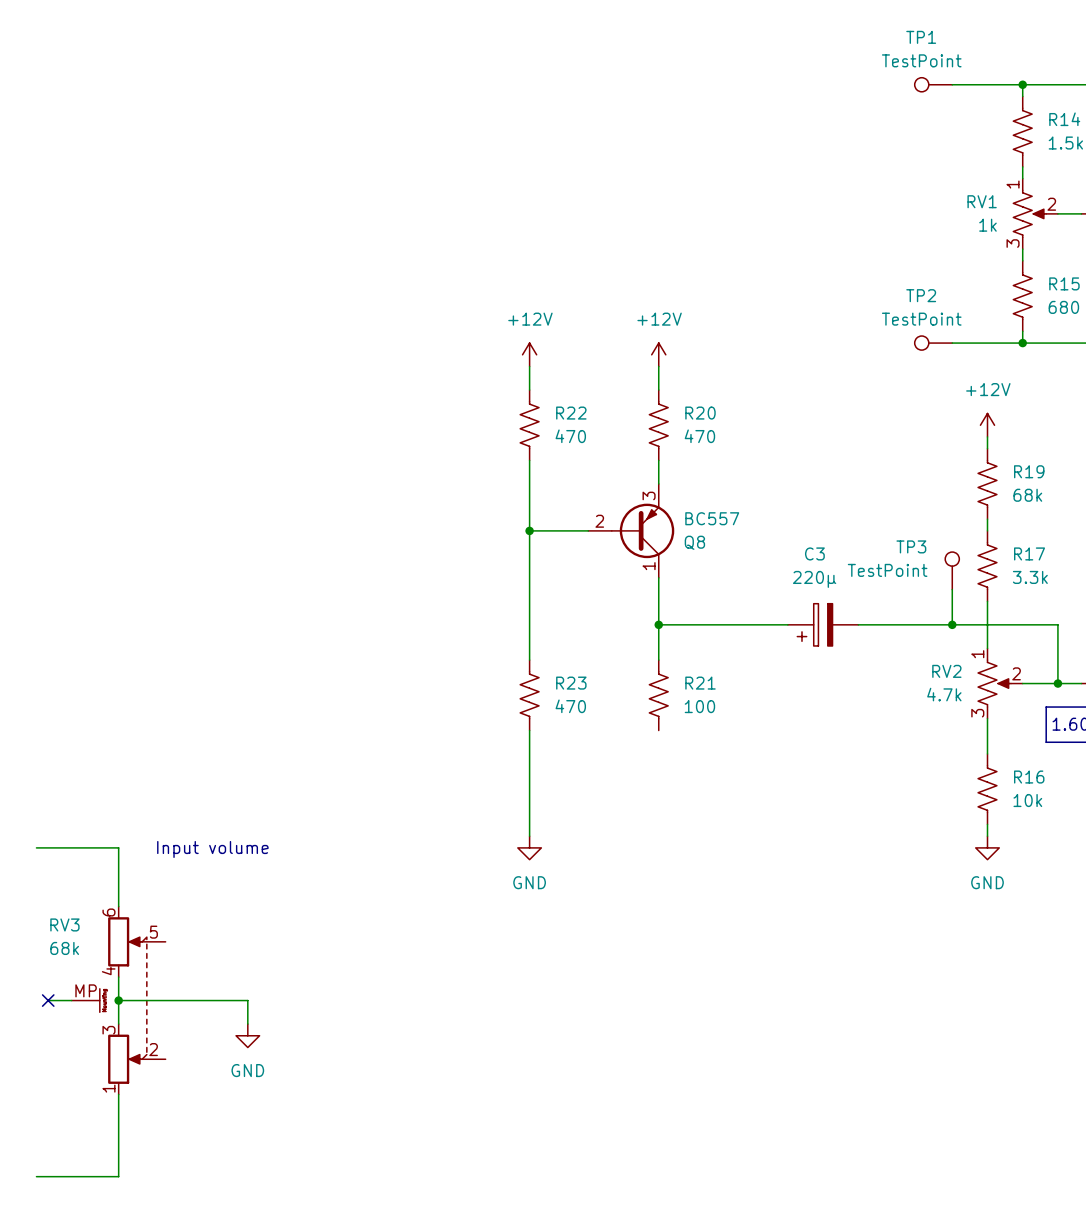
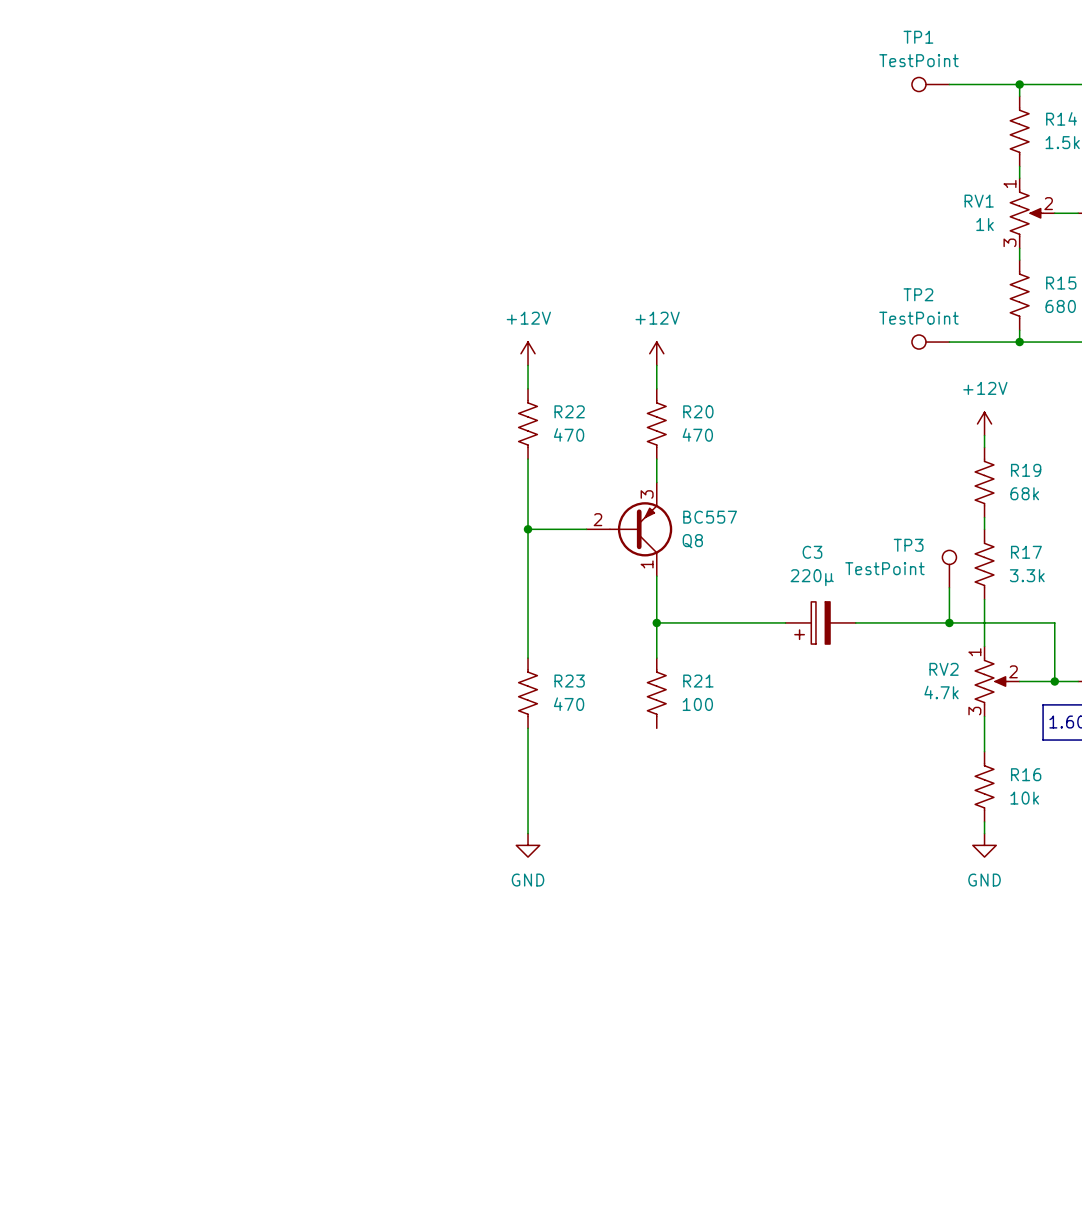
wire: (36, 847) (118, 847) (118, 906) -> none
text: Input volume (212, 849) -> none
wire: (118, 977) (118, 1024) -> none
wire: (48, 1000) (71, 1000) -> none
no-connect mark: (48, 1000) -> none
wire: (118, 1000) (247, 1000) (247, 1024) -> none
junction: (118, 1000) -> none
RV3: 68k (118, 1000) -> none
power symbol: GND (247, 1035) -> none
wire: (118, 1094) (118, 1176) (36, 1176) -> none

